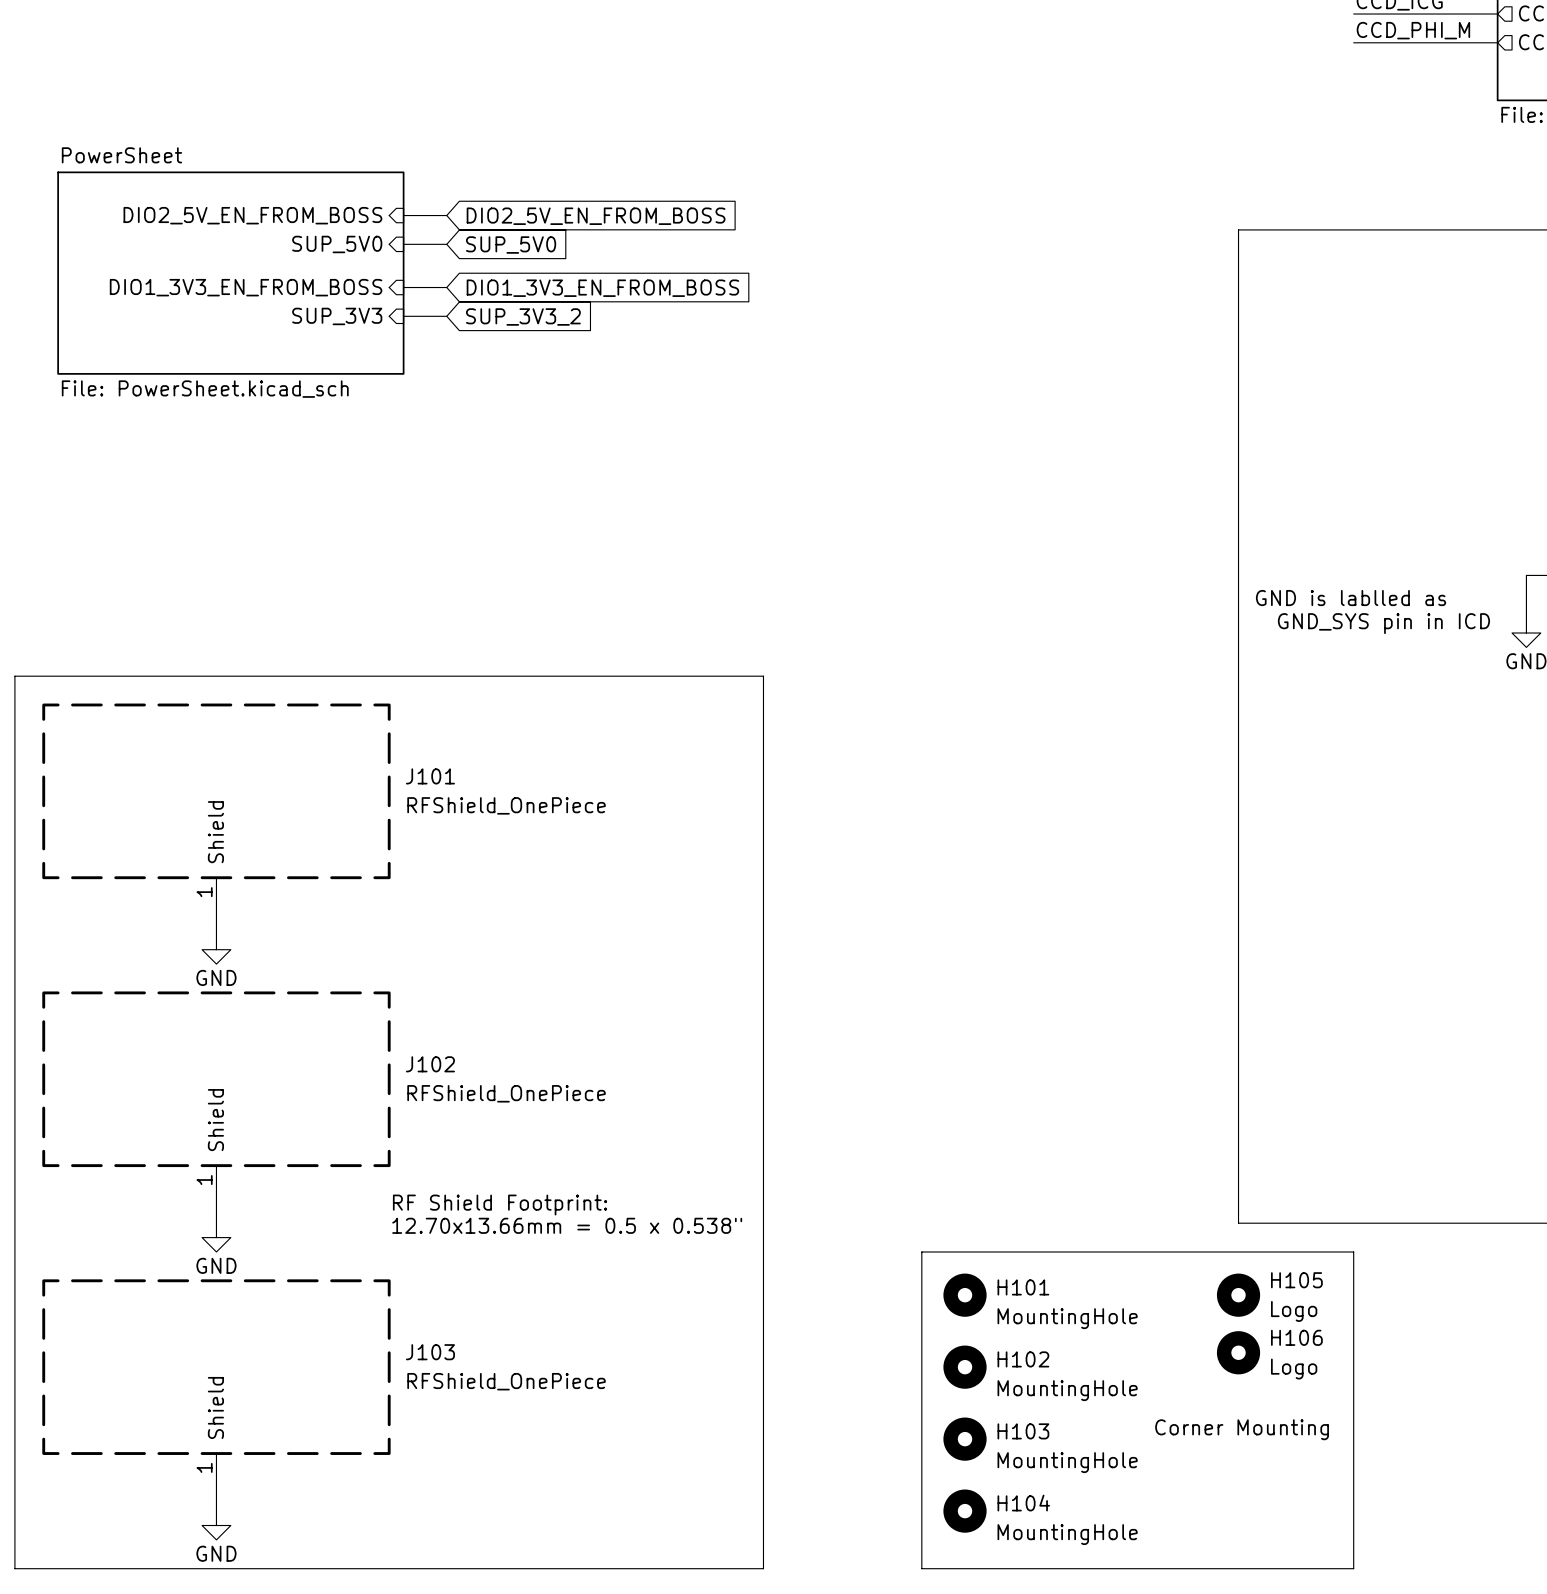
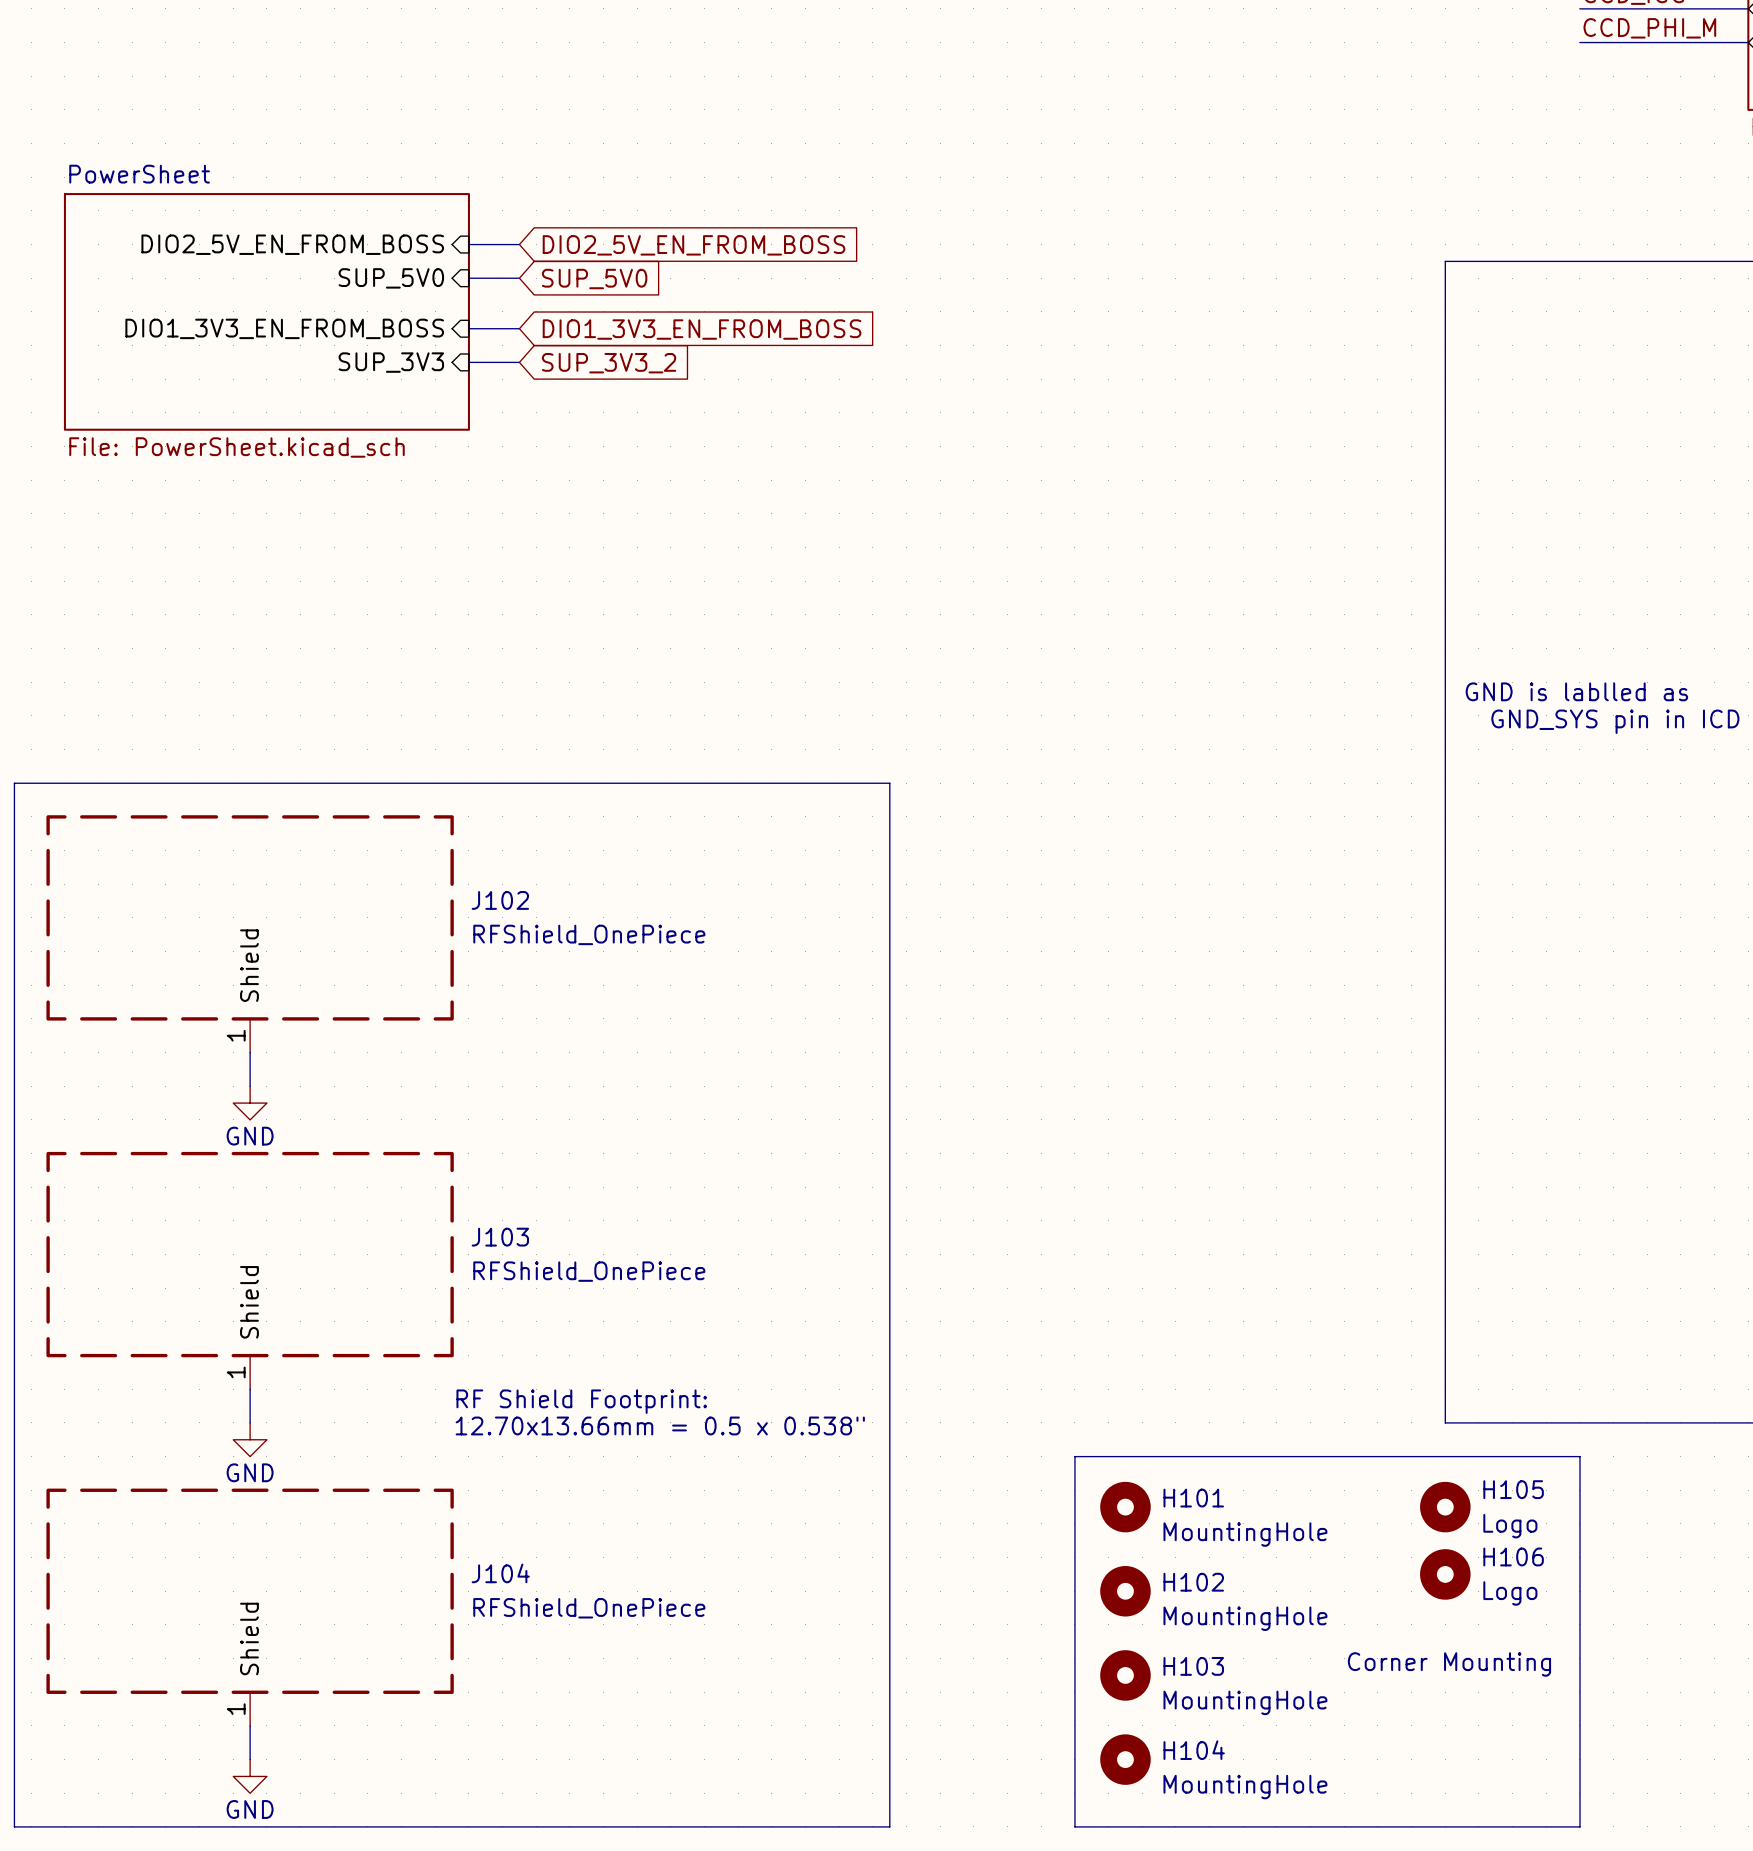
J101 name: J101 (430, 776) -> J102 (500, 900)
J102 name: J102 (430, 1064) -> J103 (500, 1237)
J103 name: J103 (430, 1352) -> J104 (500, 1573)

